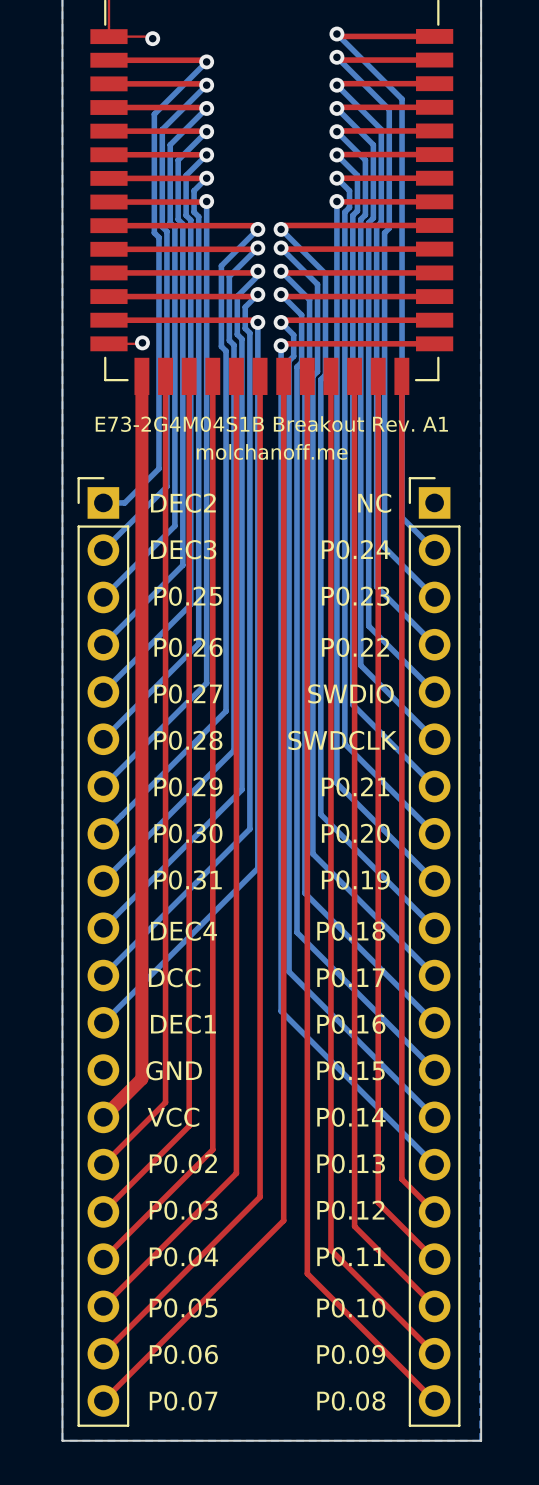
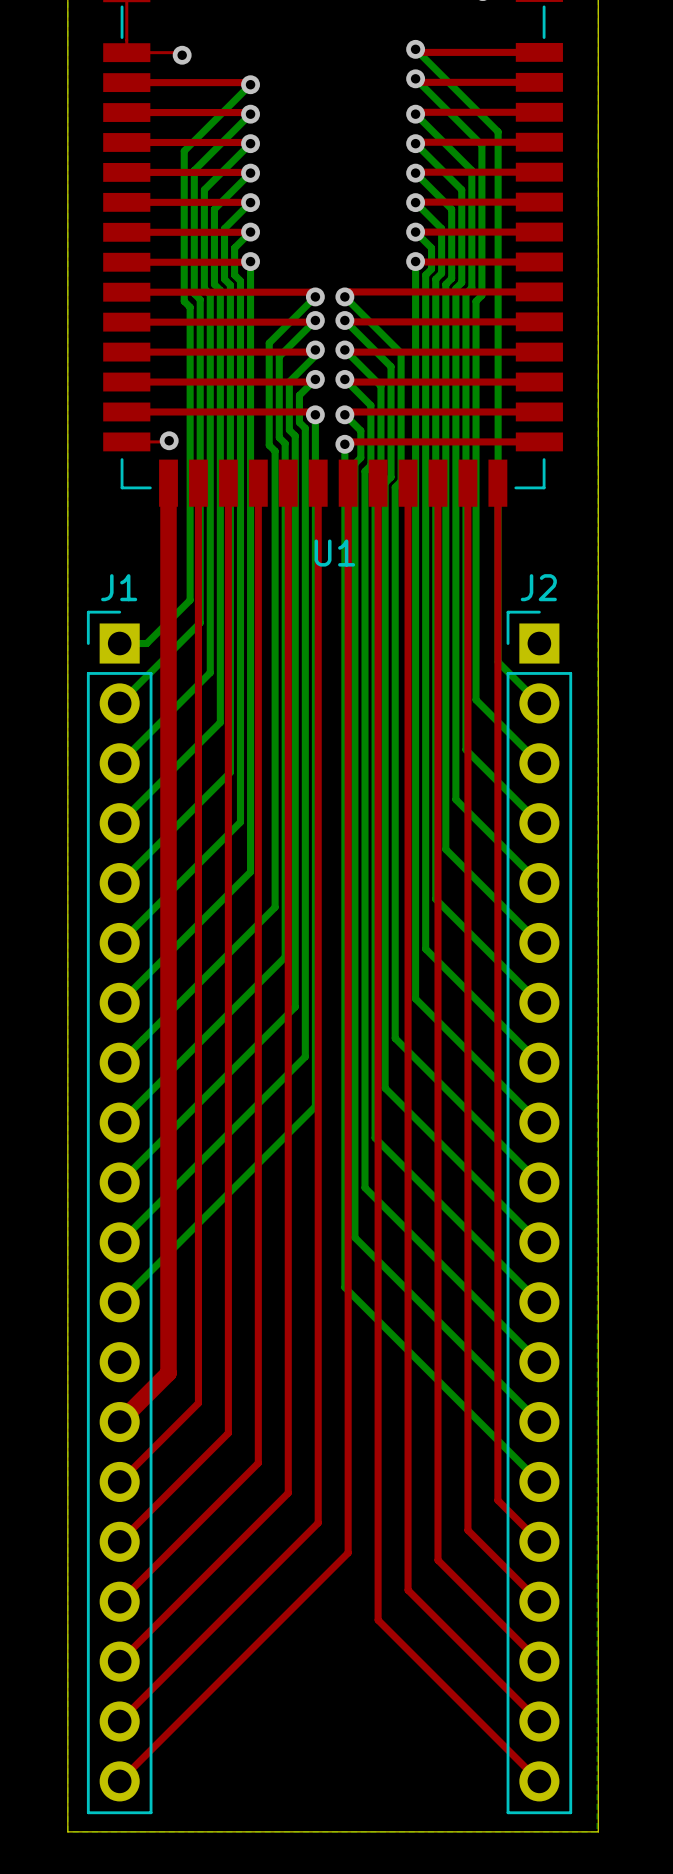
text: E73-2G4M04S1B Breakout Rev. A1 (271, 424) -> none
U1 name: none -> U1 (334, 553)
text: molchanoff.me (272, 451) -> none
J1 name: none -> J1 (119, 587)
J2 name: none -> J2 (538, 587)
text: DEC2 (183, 503) -> none
text: NC (374, 503) -> none
text: DEC3 (183, 549) -> none
text: P0.24 (356, 549) -> none
text: P0.25 (188, 596) -> none
text: P0.23 (355, 596) -> none
text: P0.26 (188, 647) -> none
text: P0.22 (355, 647) -> none
text: P0.27 (188, 693) -> none
text: SWDIO (351, 693) -> none
text: P0.28 (188, 740) -> none
text: SWDCLK (342, 740) -> none
text: P0.29 (188, 786) -> none
text: P0.21 (355, 786) -> none
text: P0.30 (188, 833) -> none
text: P0.20 (355, 833) -> none
text: P0.31 (188, 879) -> none
text: P0.19 (355, 879) -> none
text: DEC4 (183, 931) -> none
text: P0.18 (351, 931) -> none
text: DCC (174, 977) -> none
text: P0.17 (351, 977) -> none
text: DEC1 (183, 1024) -> none
text: P0.16 (351, 1024) -> none
text: GND (174, 1070) -> none
text: P0.15 (351, 1070) -> none
text: VCC (173, 1117) -> none
text: P0.14 (351, 1117) -> none
text: P0.02 (183, 1163) -> none
text: P0.13 (351, 1163) -> none
text: P0.03 (183, 1210) -> none
text: P0.12 (350, 1210) -> none
text: P0.04 (183, 1256) -> none
text: P0.11 (350, 1256) -> none
text: P0.05 (183, 1307) -> none
text: P0.10 (351, 1307) -> none
text: P0.06 (183, 1354) -> none
text: P0.09 (351, 1354) -> none
text: P0.07 (183, 1401) -> none
text: P0.08 (351, 1401) -> none

